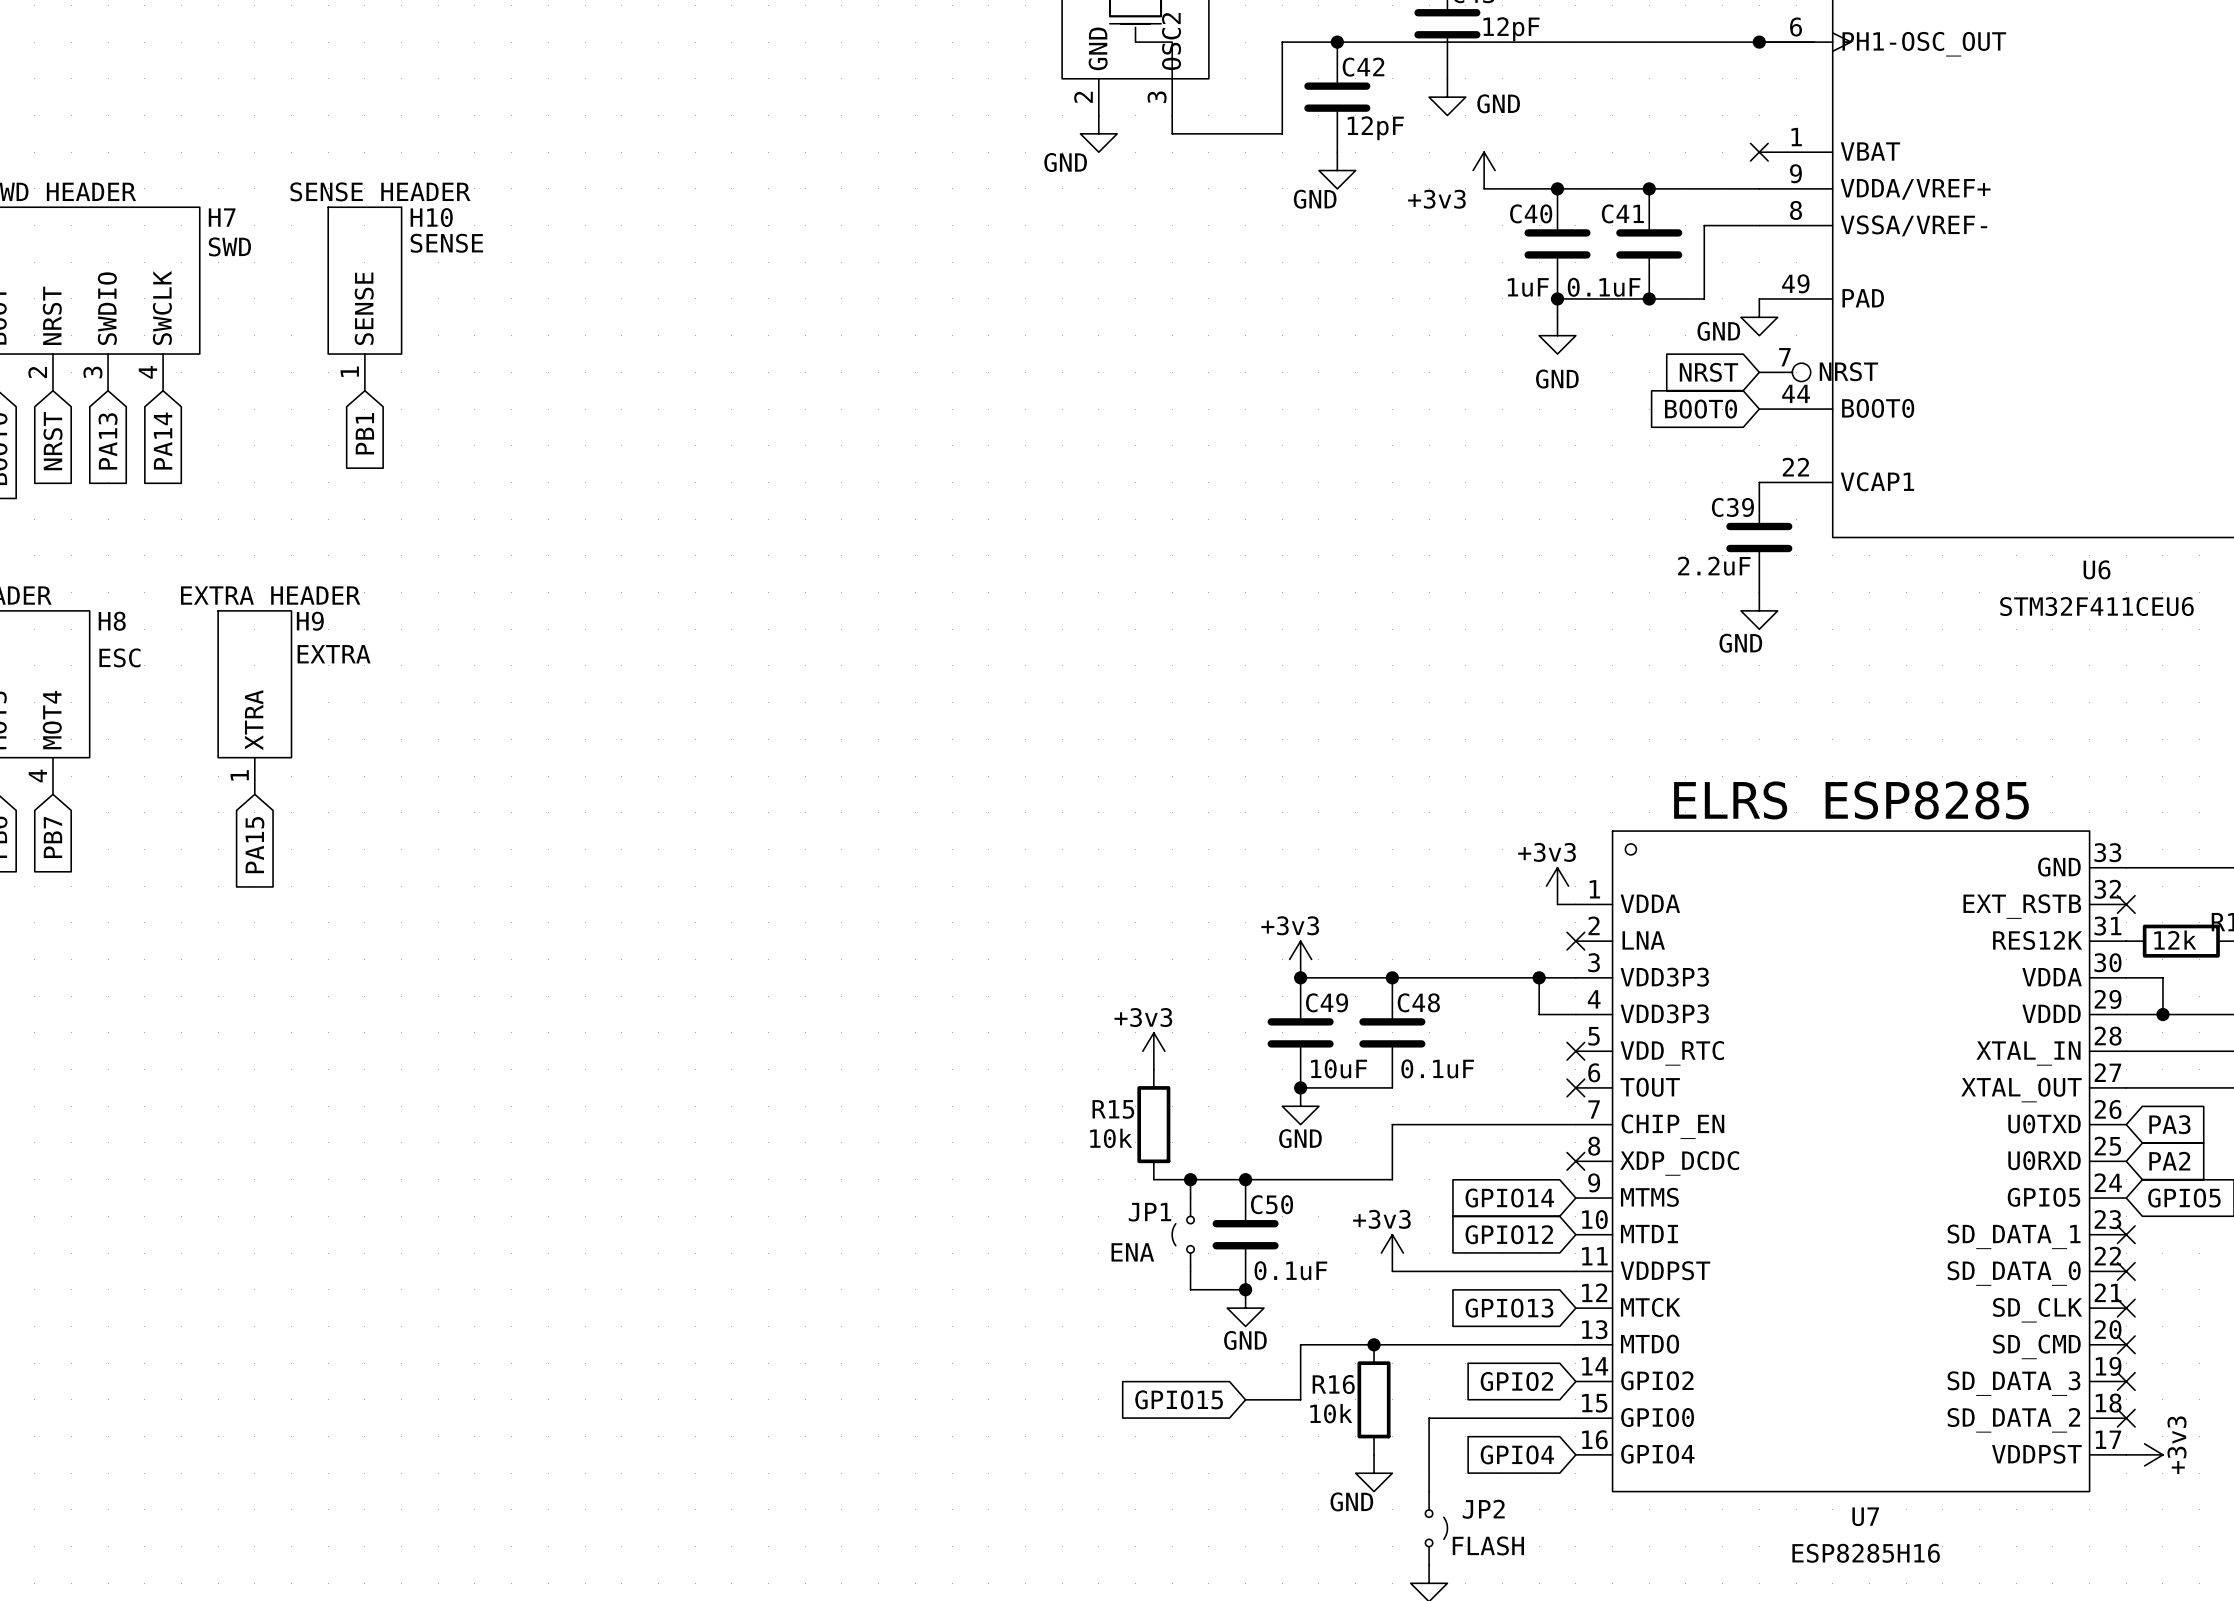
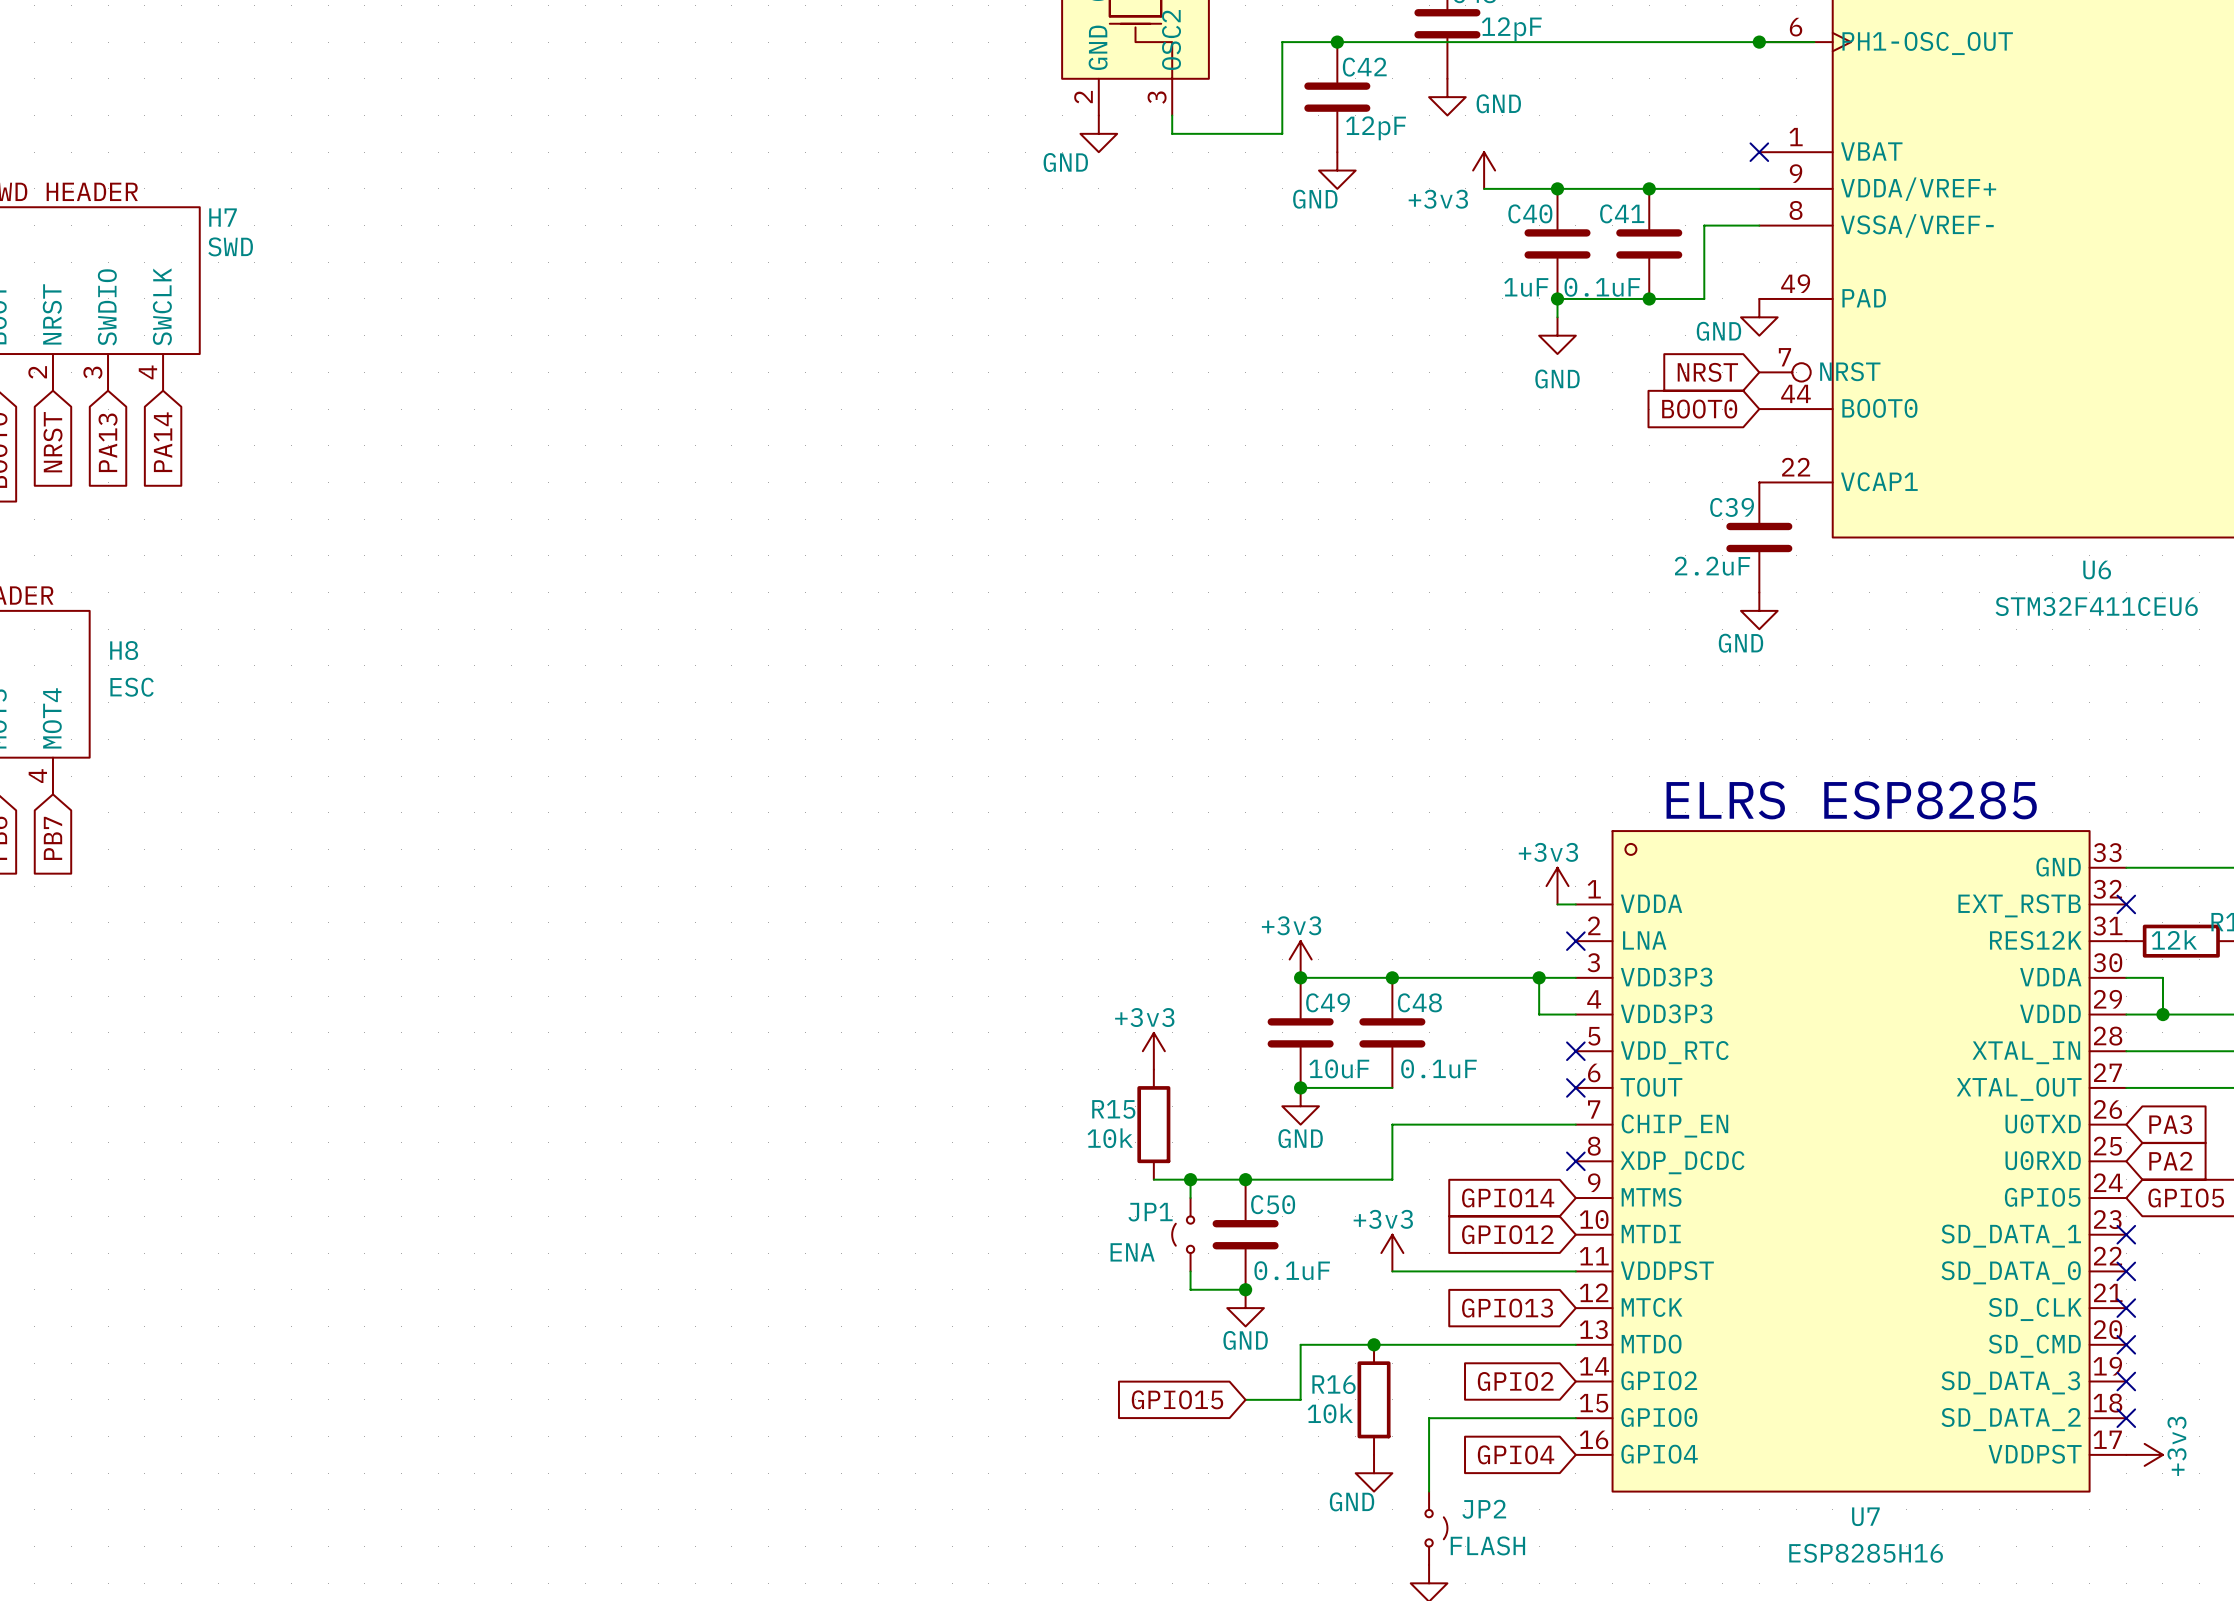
H10: SENSE (364, 298) -> none
global label: PB1 (364, 433) -> none
H8 name position: H8 (112, 621) -> H8 (124, 650)
H8 value position: ESC (119, 657) -> ESC (132, 687)
H9: EXTRA (254, 702) -> none
global label: PA15 (254, 845) -> none

